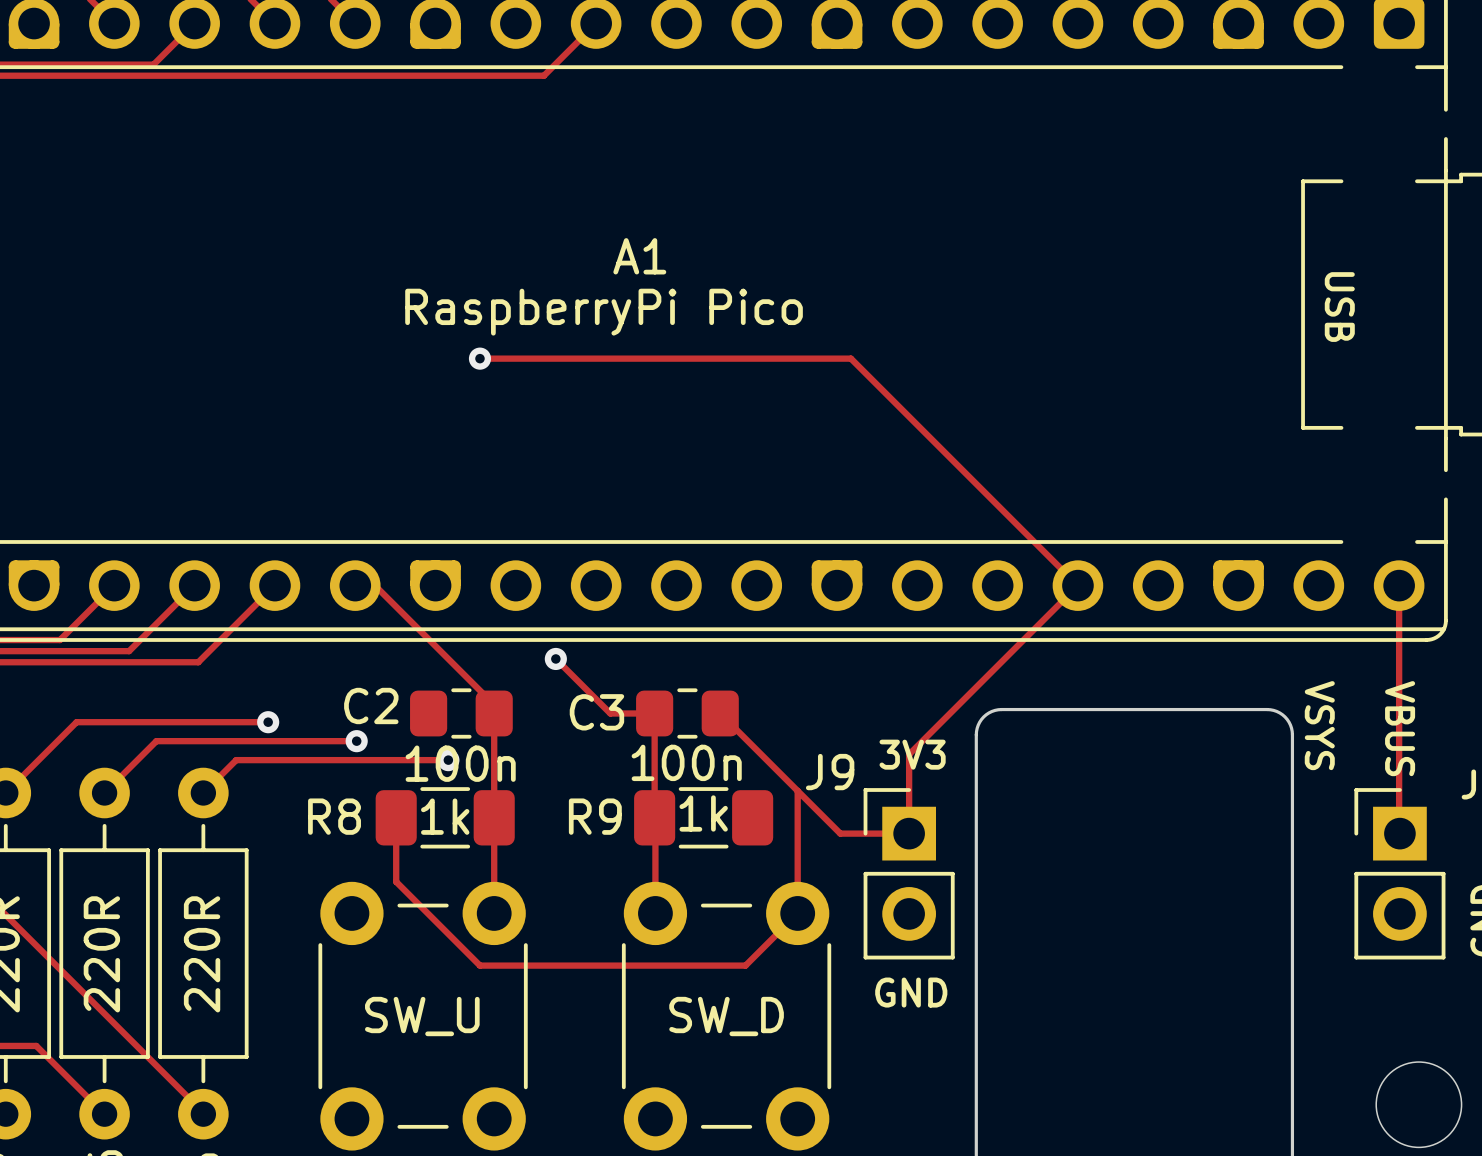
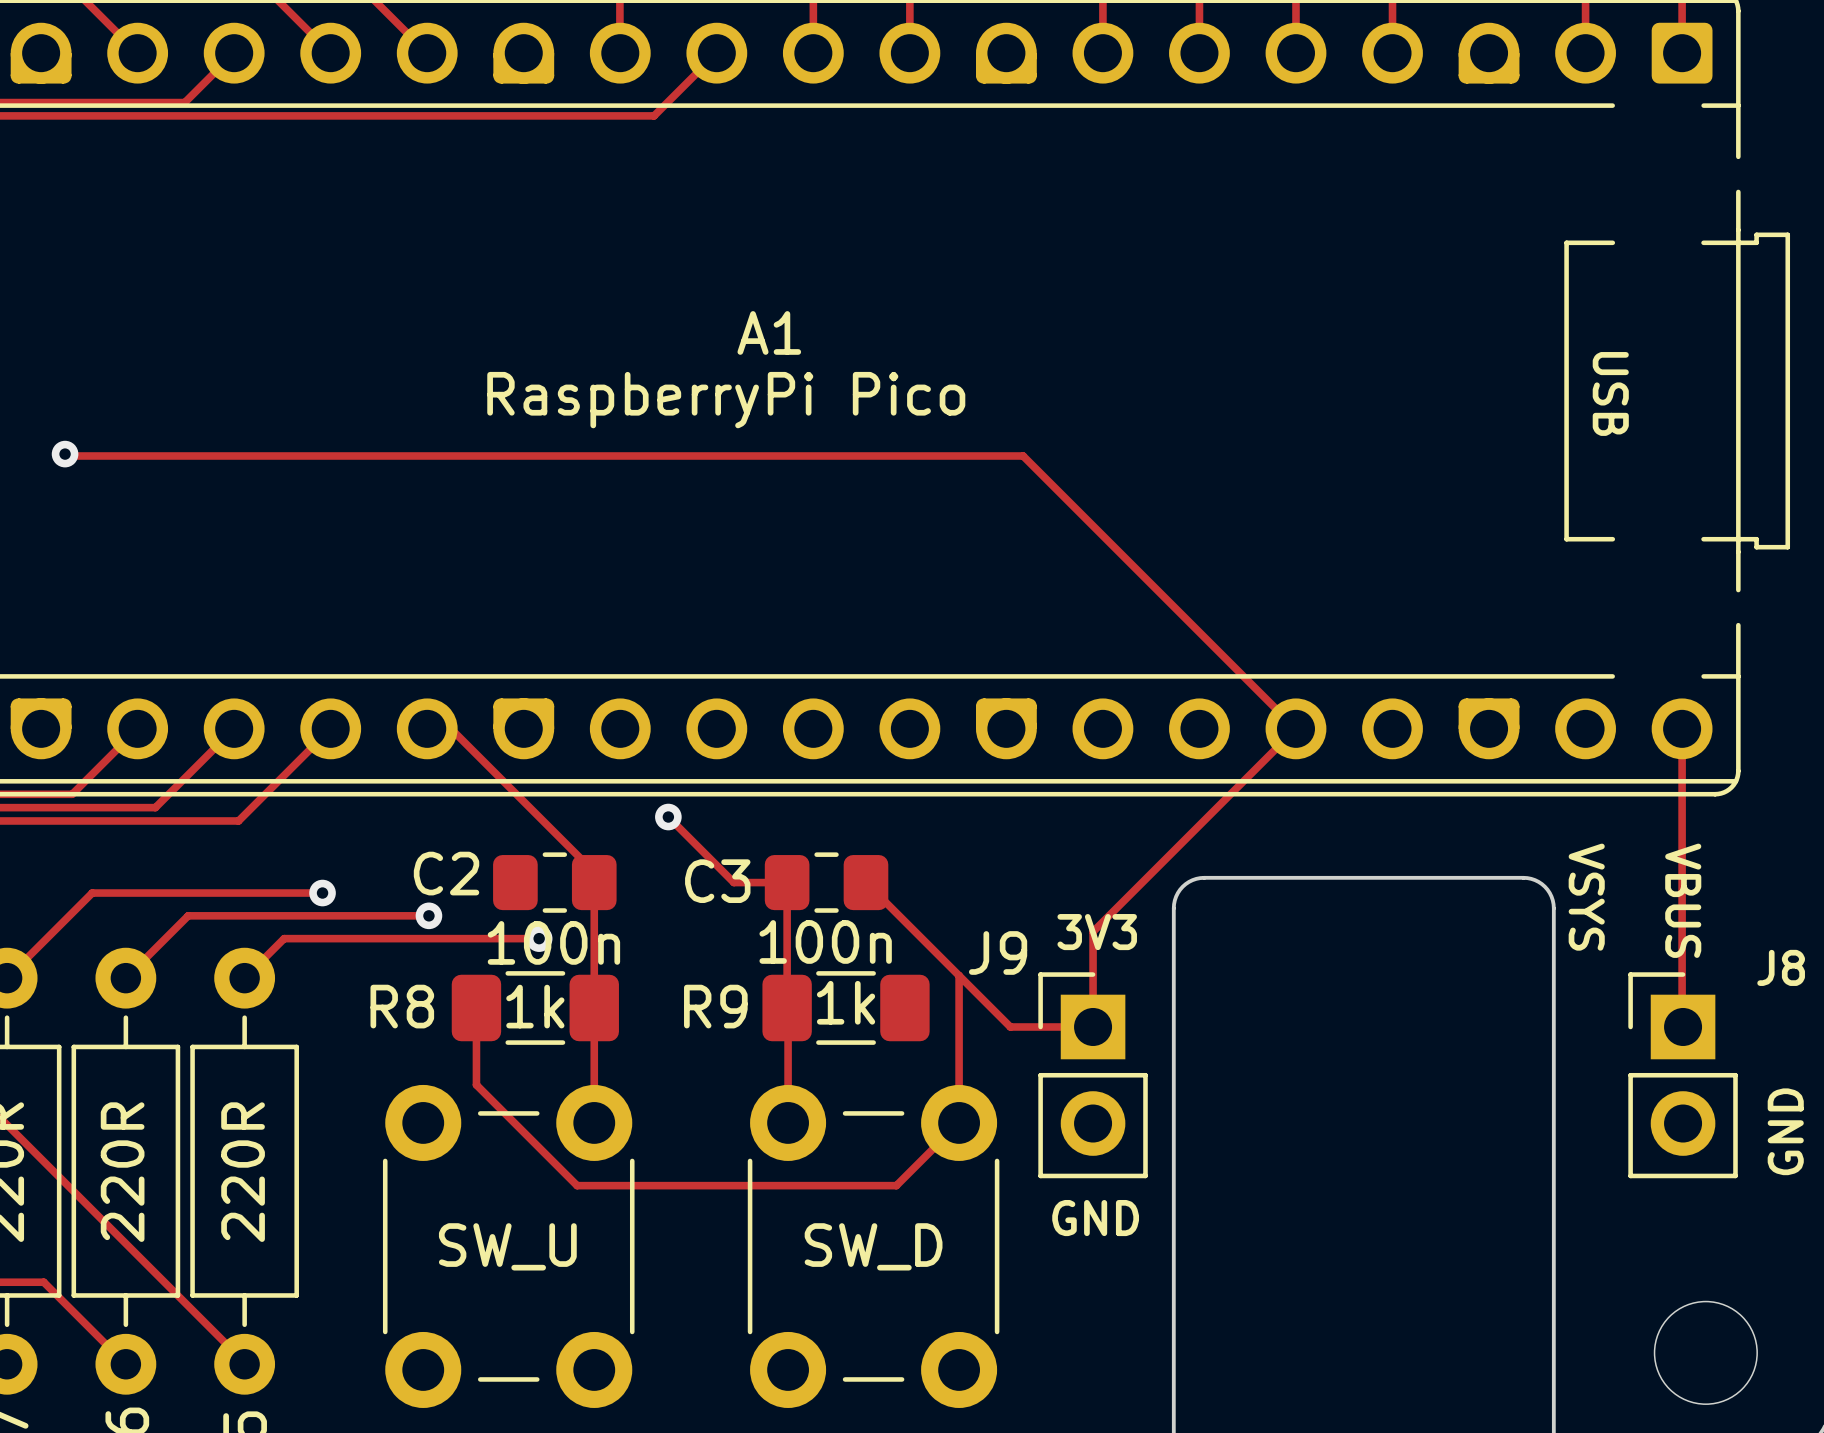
track: none -> (65, 454) (66, 455) (577, 455)
via: none -> (65, 454)
via: (479, 358) -> none

